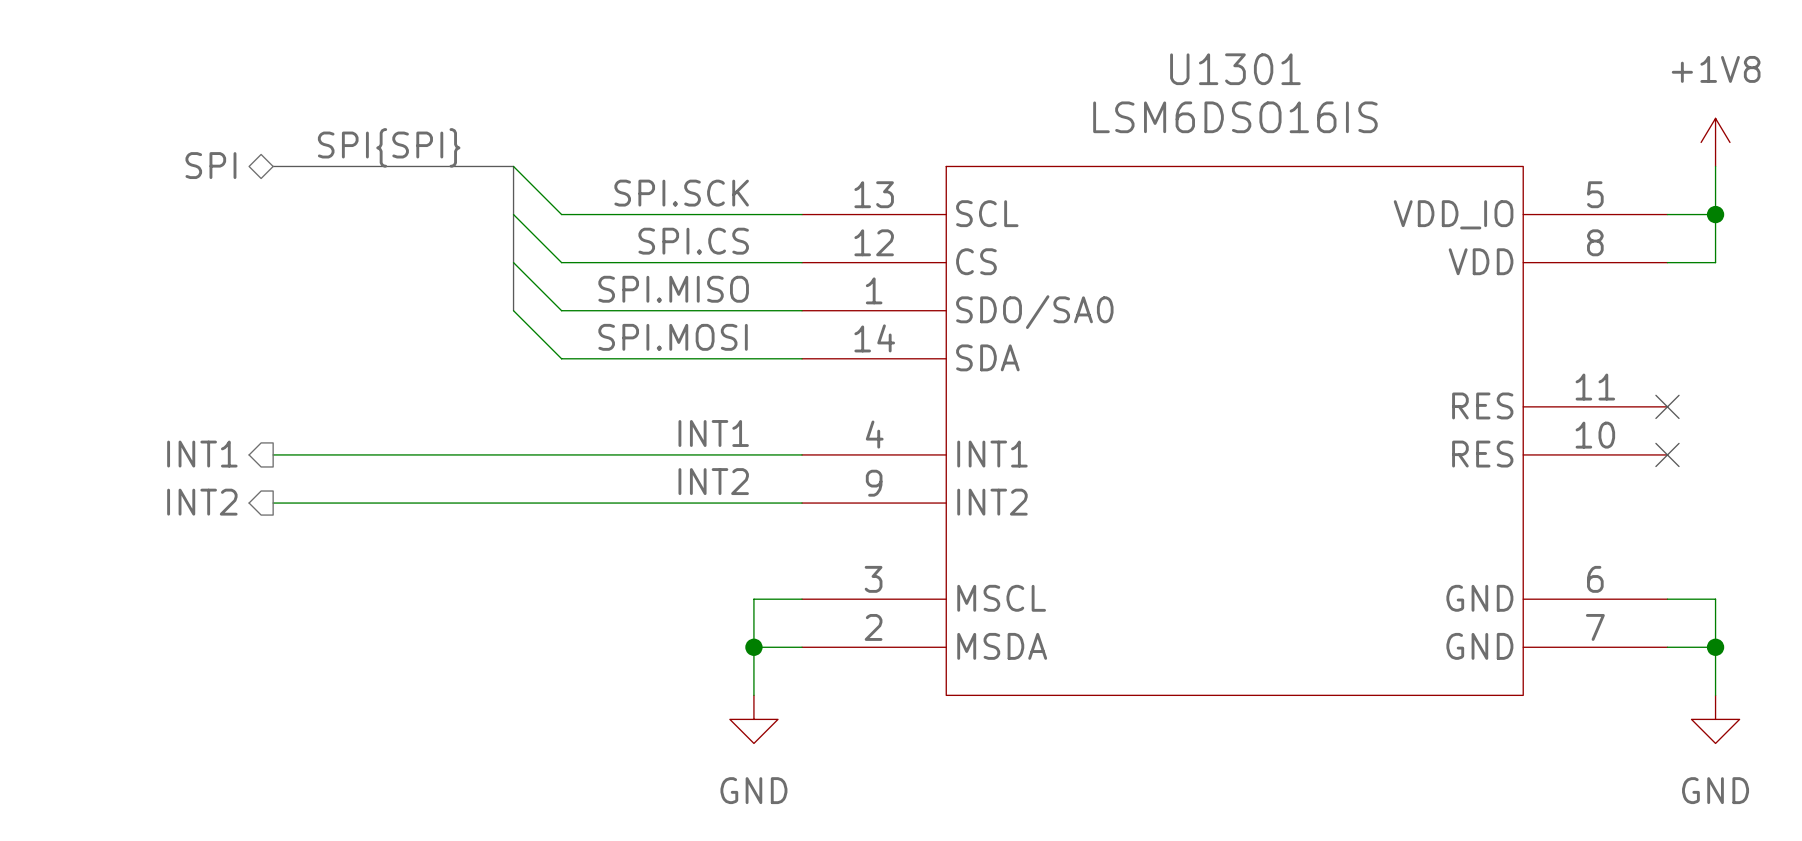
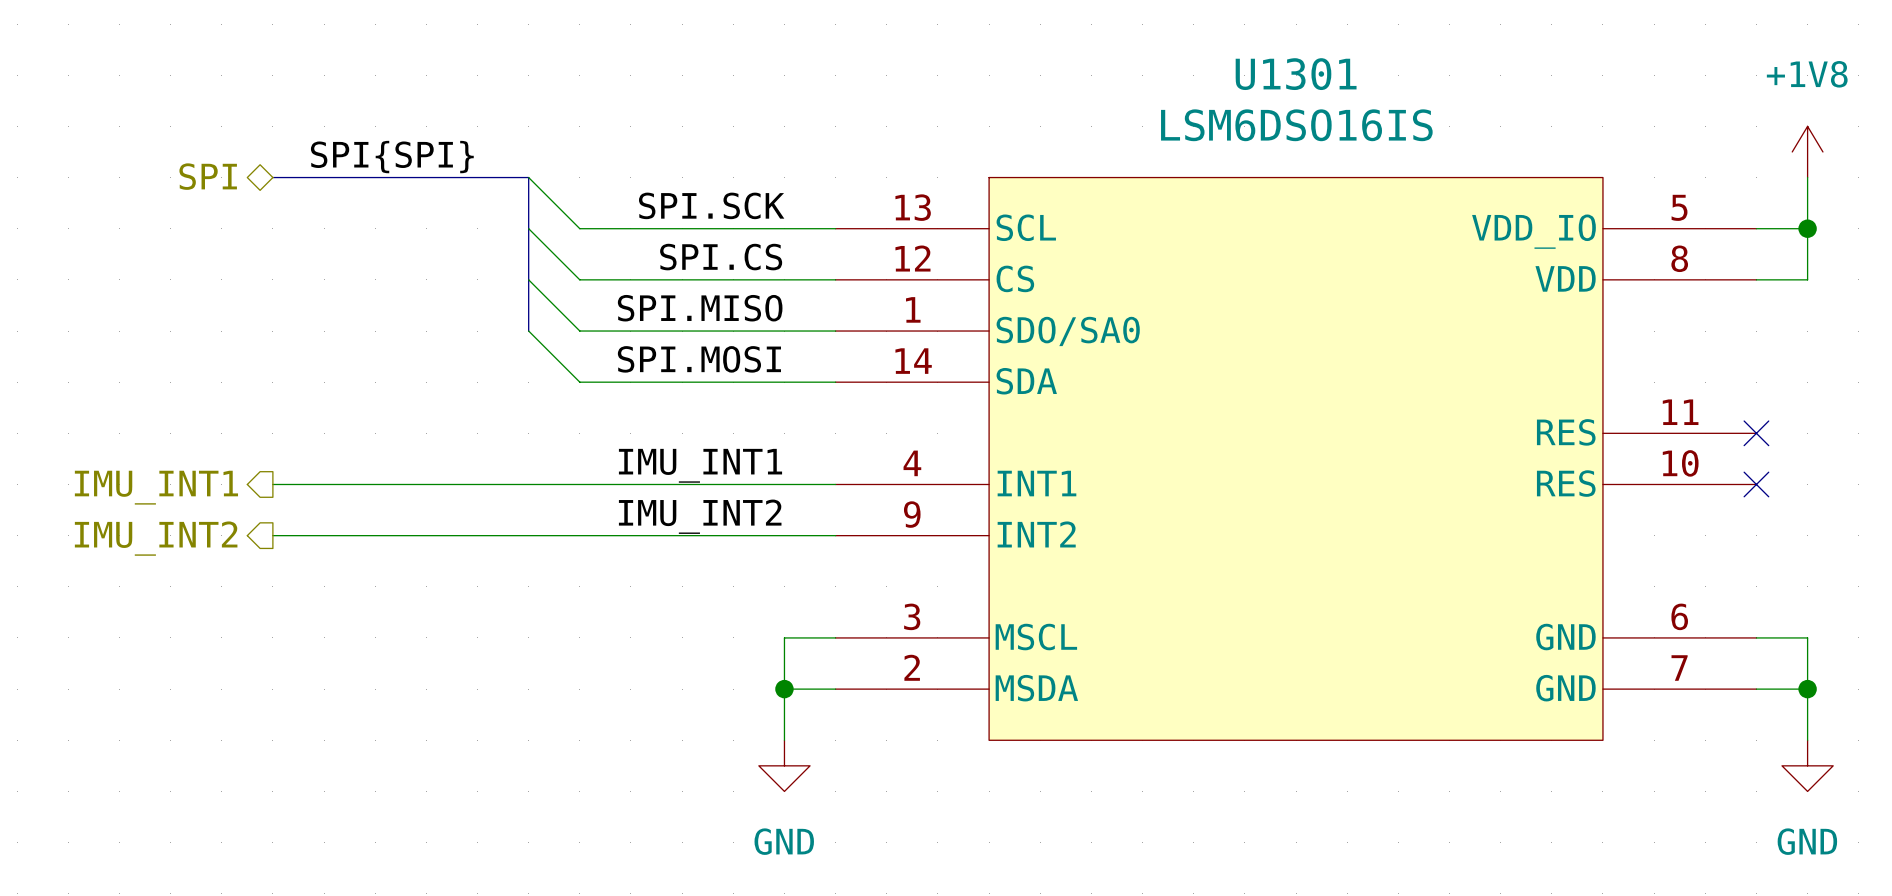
label: INT1 (713, 433) -> IMU_INT1 (700, 465)
hierarchical label: INT1 (202, 454) -> IMU_INT1 (156, 487)
label: INT2 (713, 481) -> IMU_INT2 (700, 516)
hierarchical label: INT2 (202, 502) -> IMU_INT2 (156, 538)

